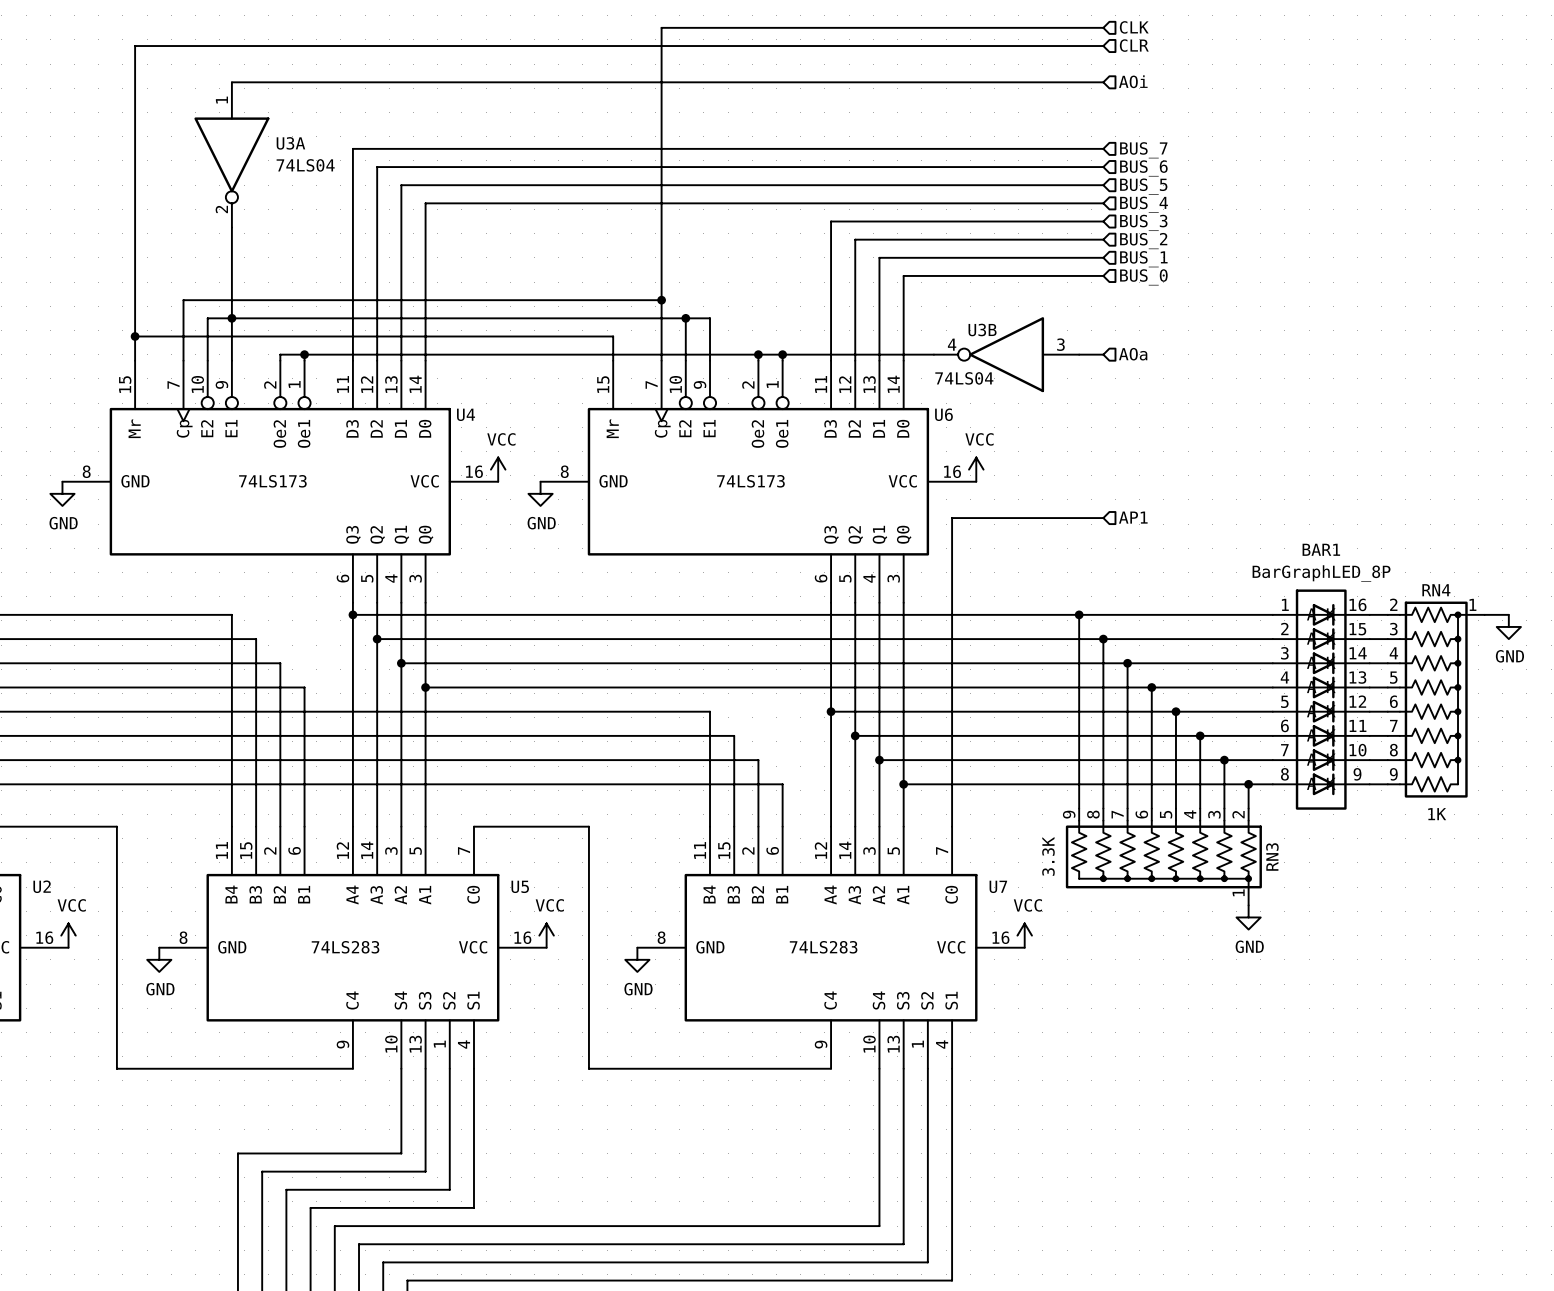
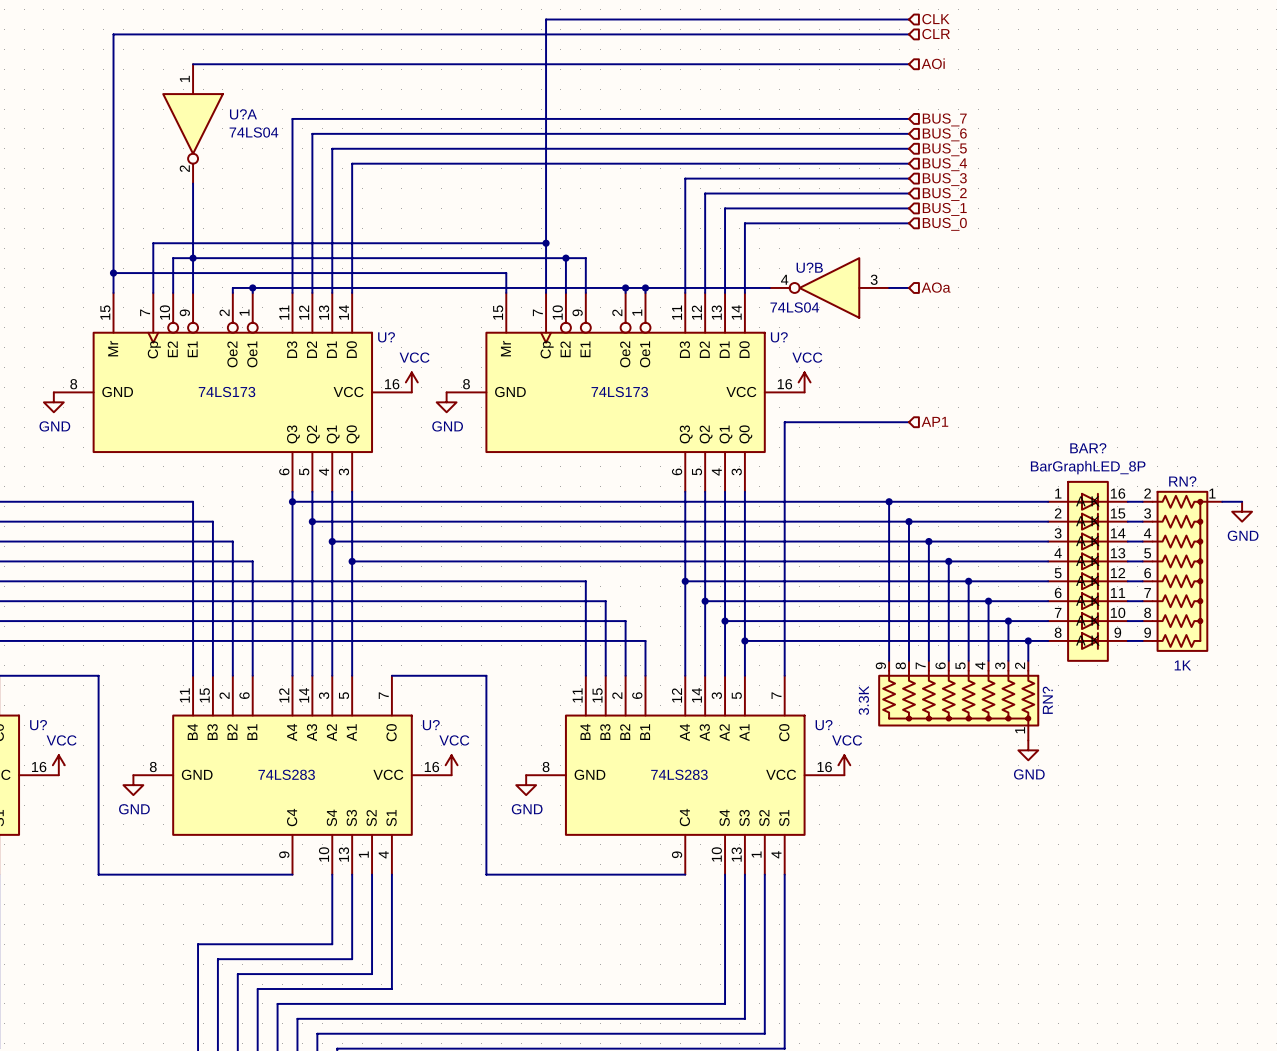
U3A name: U3A (290, 143) -> U?A (243, 114)
U3B name: U3B (982, 330) -> U?B (809, 267)
U4 name: U4 (466, 414) -> U? (386, 337)
U6 name: U6 (943, 414) -> U? (779, 337)
BAR1 name: BAR1 (1321, 549) -> BAR? (1088, 448)
RN4 name: RN4 (1436, 590) -> RN? (1182, 481)
RN3 name: RN3 (1272, 856) -> RN? (1047, 700)
U2 name: U2 (42, 886) -> U? (38, 725)
U5 name: U5 (520, 886) -> U? (431, 725)
U7 name: U7 (998, 886) -> U? (824, 725)

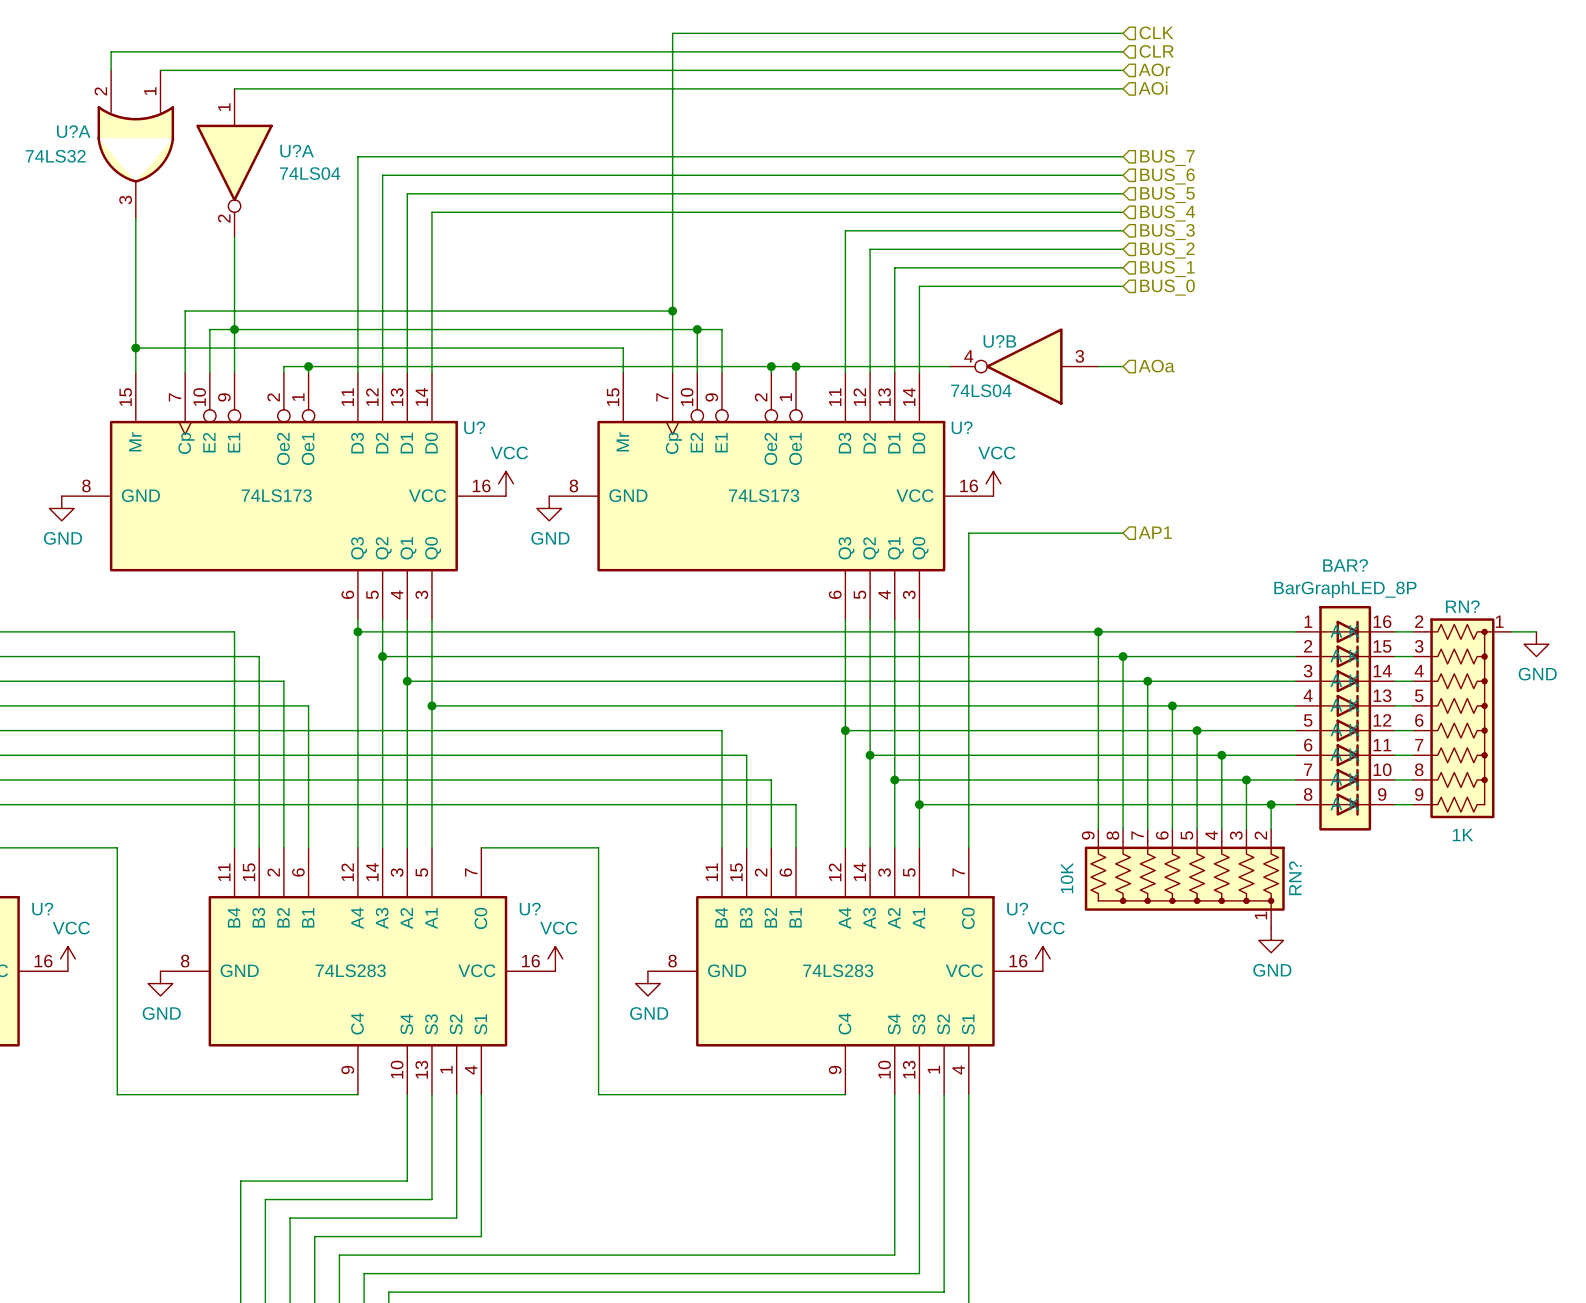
wire: (113, 34) (113, 168) -> (135, 51) (111, 51) (111, 70)
hierarchical label: none -> AOr (1154, 69)
wire: none -> (160, 70) (1123, 70)
U?A: none -> 74LS32 (135, 144)
RN? value: 3.3K (863, 700) -> 10K (1067, 878)

